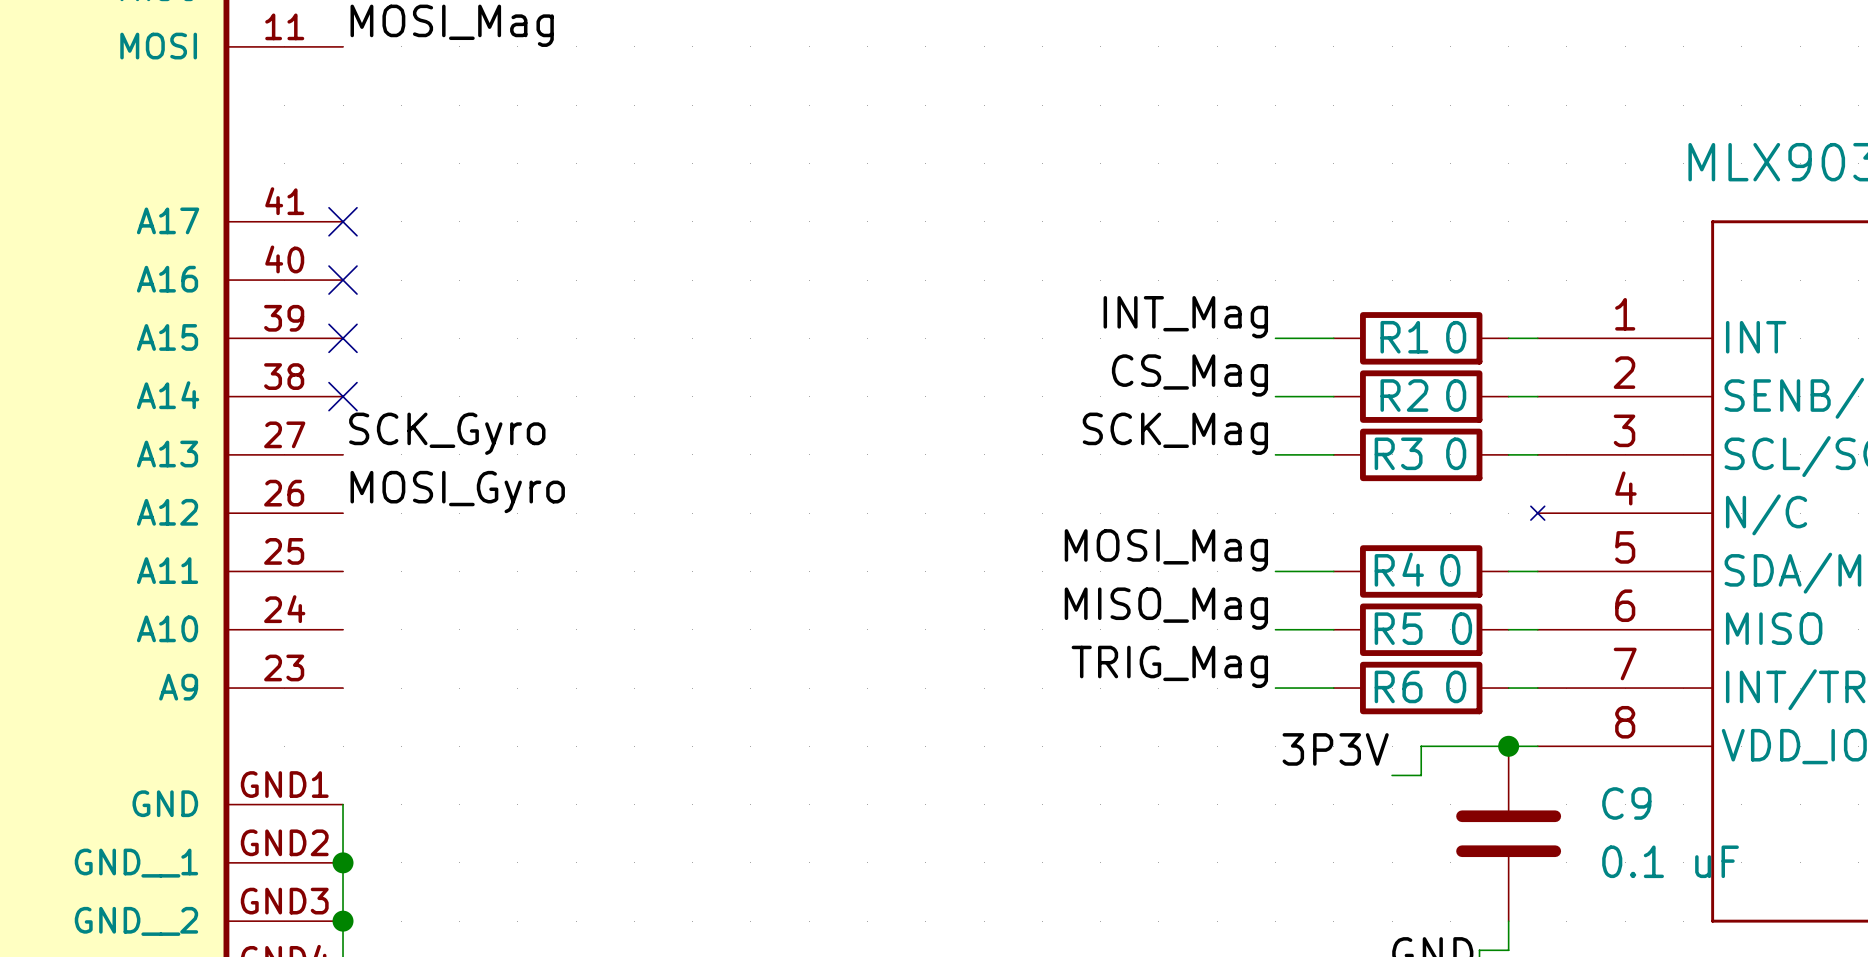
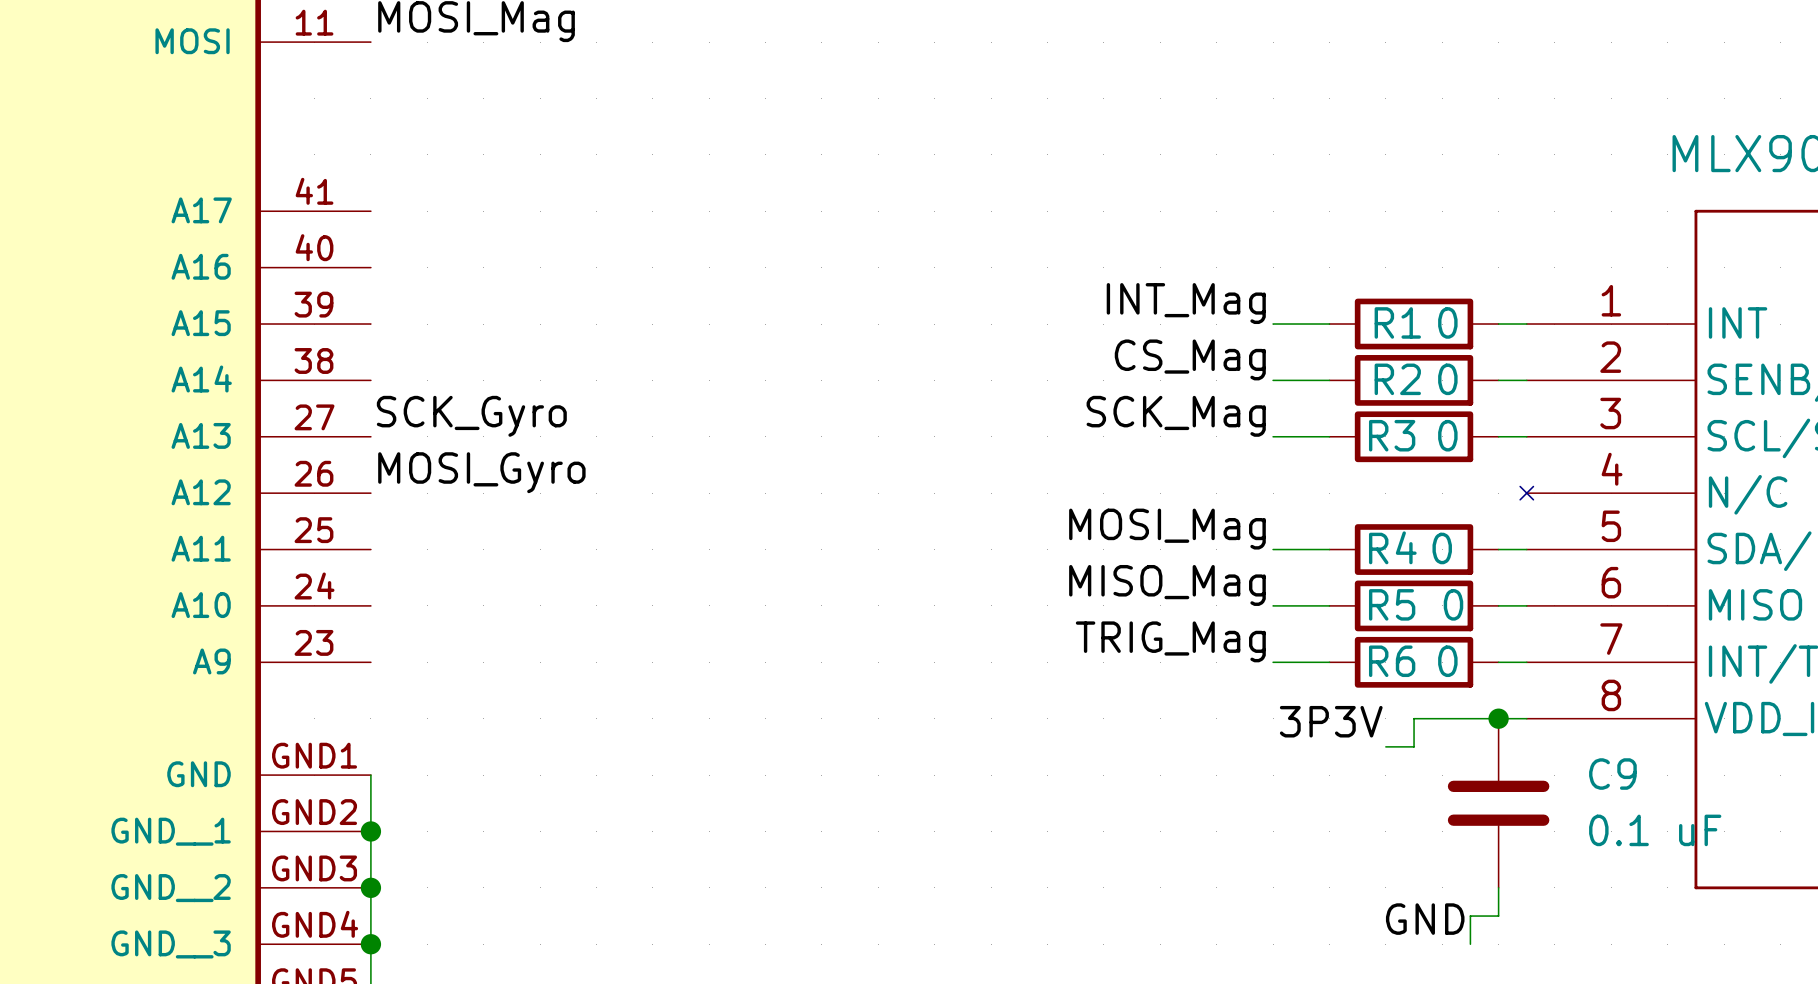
no-connect mark: (343, 221) -> none
no-connect mark: (343, 280) -> none
no-connect mark: (343, 338) -> none
no-connect mark: (343, 396) -> none

